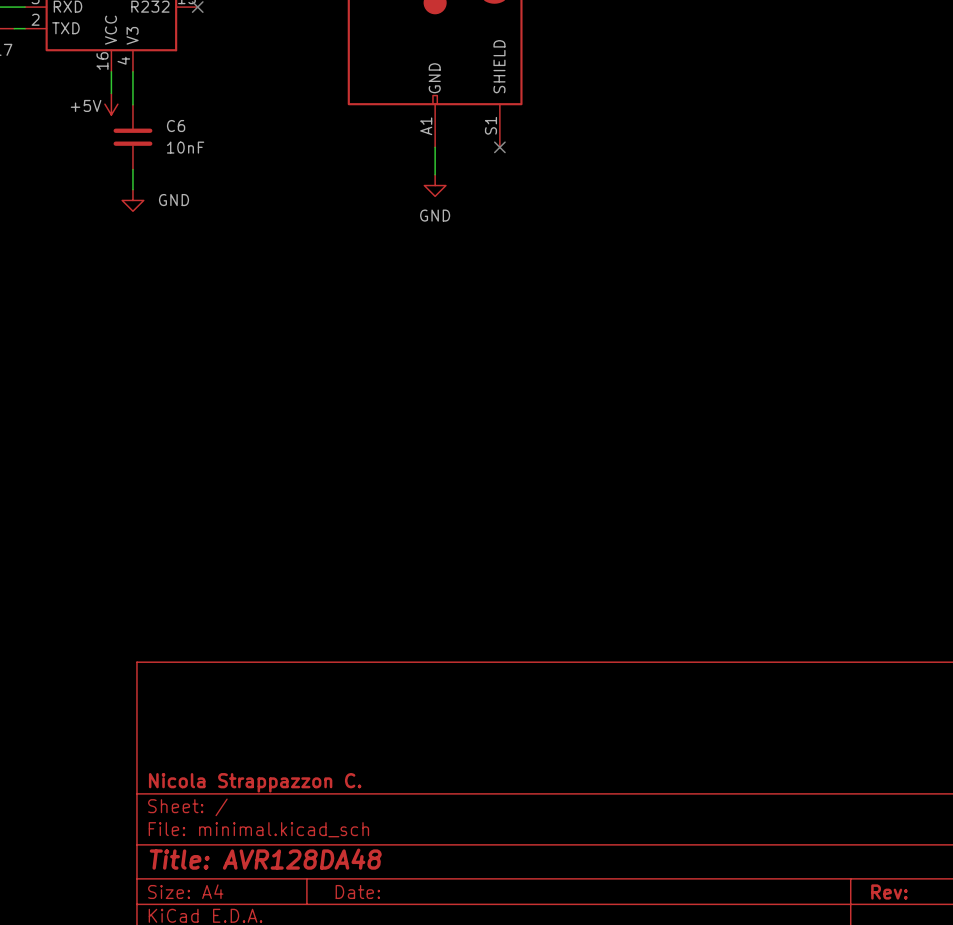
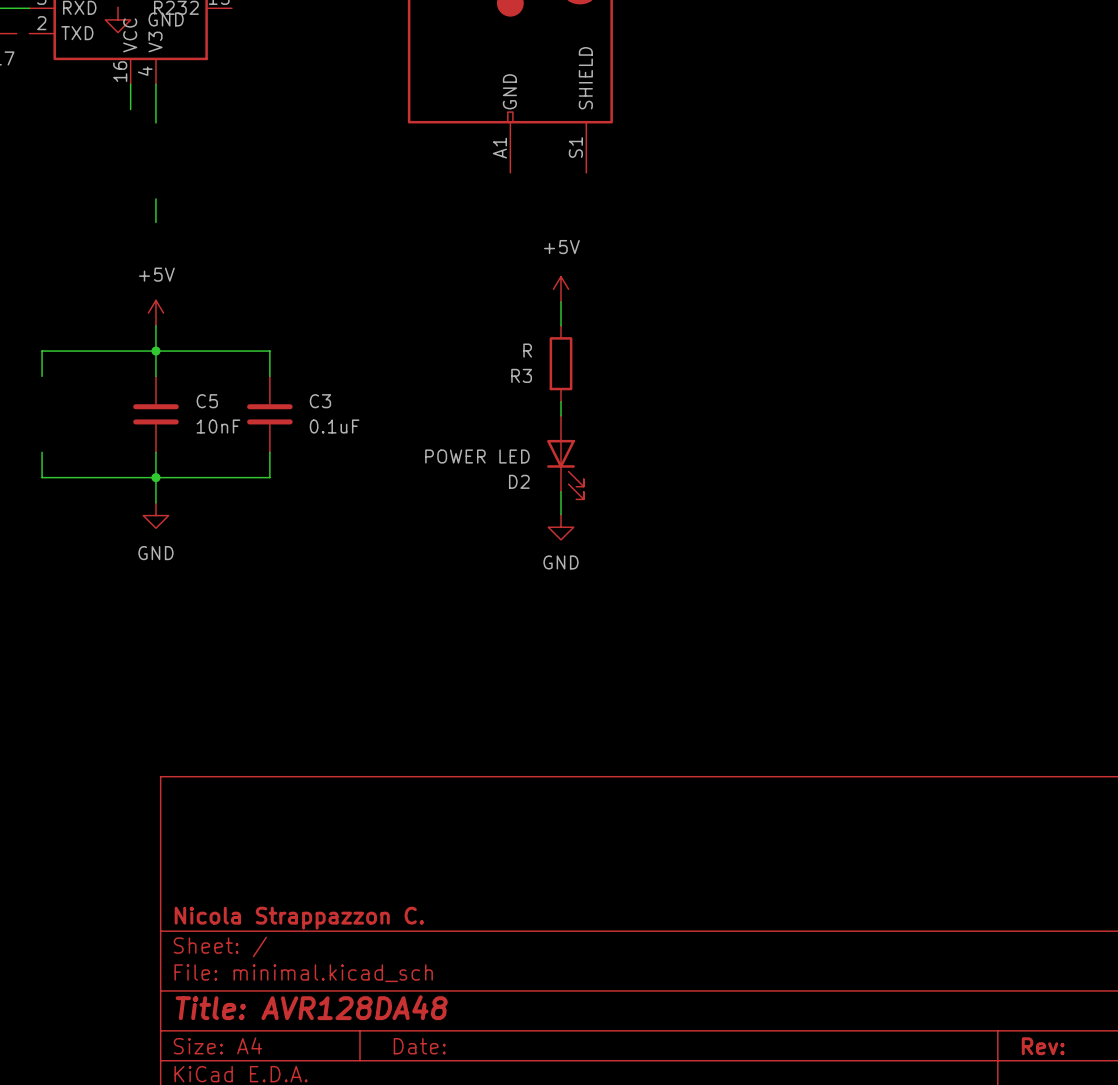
no-connect mark: (197, 7) -> none
power symbol: none -> GND (118, 19)
wire: (14, 28) (25, 28) -> none
power symbol: +5V (111, 104) -> none
C6: 10nF (132, 137) -> none
wire: (435, 147) (435, 174) -> none
no-connect mark: (499, 147) -> none
power symbol: GND (435, 185) -> none
power symbol: GND (132, 200) -> none
power symbol: none -> +5V (561, 289)
wire: none -> (561, 301) (561, 325)
power symbol: none -> +5V (155, 313)
wire: none -> (155, 325) (155, 376)
junction: none -> (155, 351)
R3: none -> R (561, 363)
wire: none -> (42, 376) (42, 351) (269, 351) (269, 376)
wire: none -> (561, 401) (561, 415)
C5: none -> 10nF (155, 414)
C3: none -> 0.1uF (269, 414)
wire: none -> (42, 452) (42, 477) (269, 477) (269, 452)
wire: none -> (155, 452) (155, 502)
D2: none -> POWER LED (565, 457)
junction: none -> (155, 477)
wire: none -> (561, 491) (561, 514)
power symbol: none -> GND (155, 515)
power symbol: none -> GND (561, 527)

